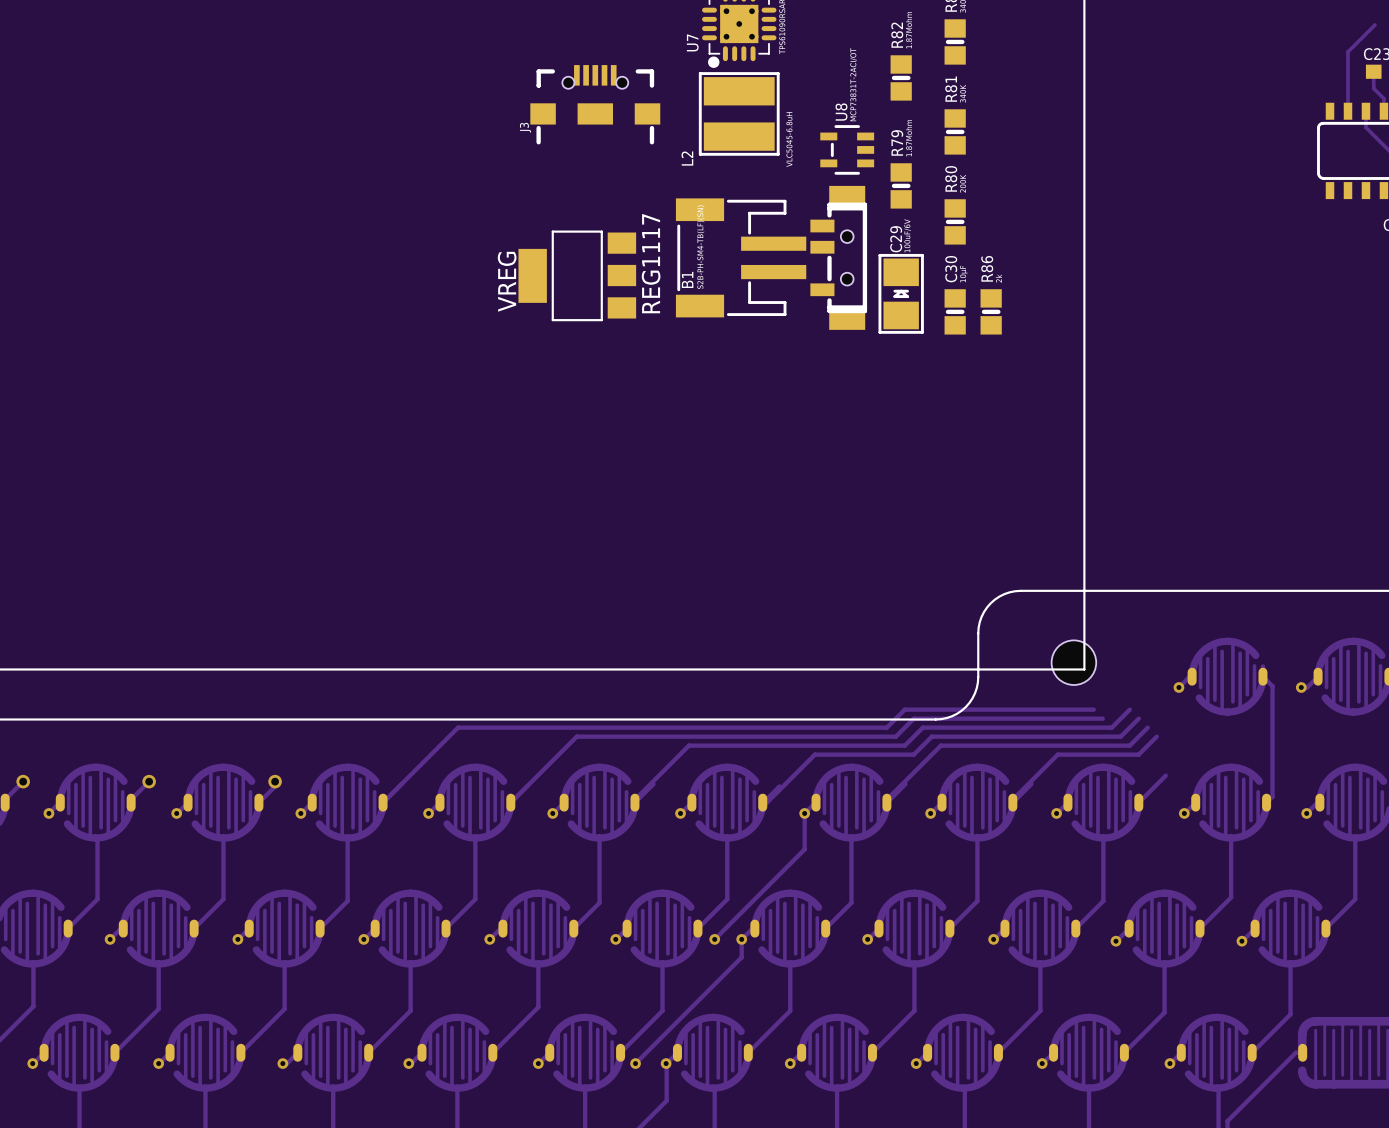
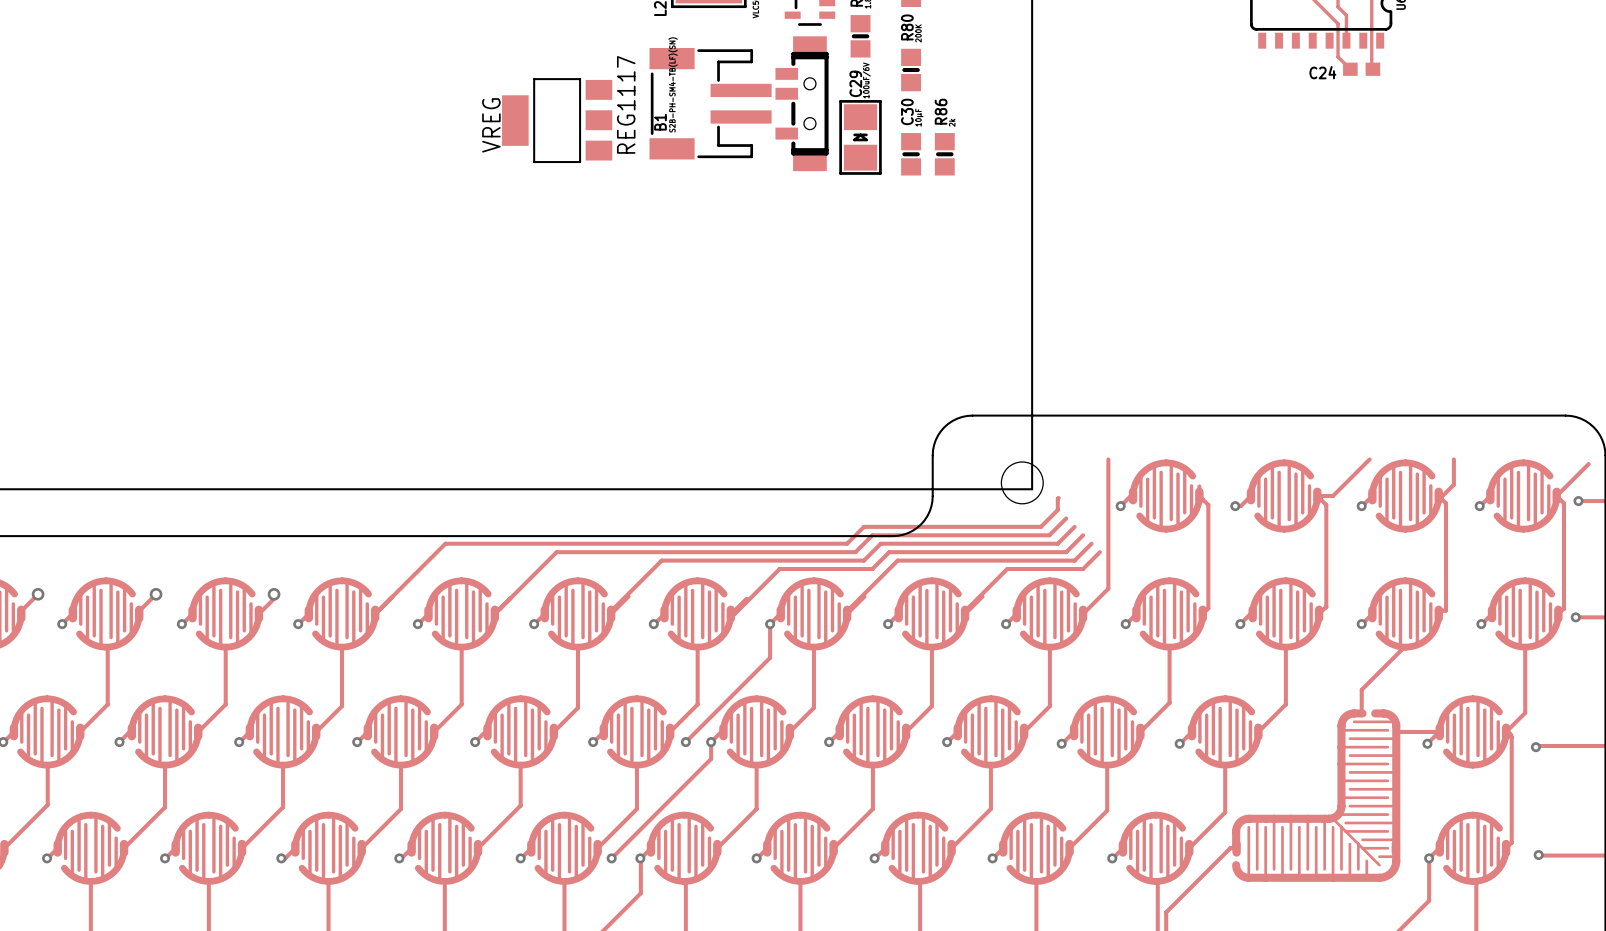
track: none -> (1108, 459) (1108, 588)
track: none -> (1058, 497) (1057, 510) (1040, 526)
track: none -> (1066, 518) (1049, 535)

